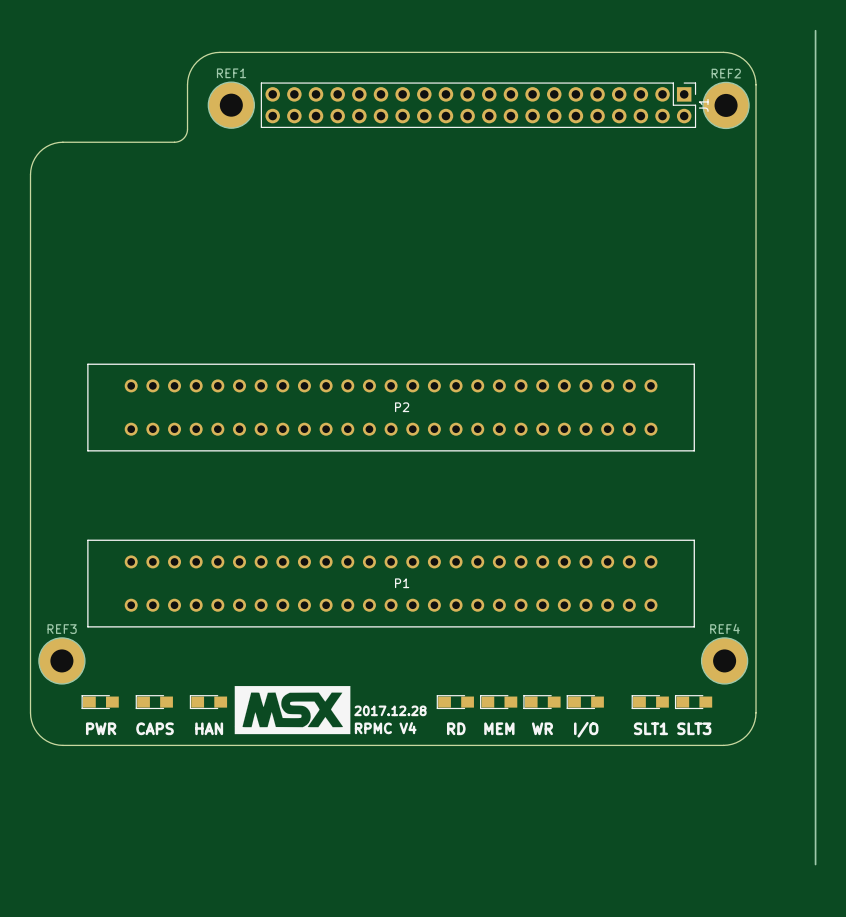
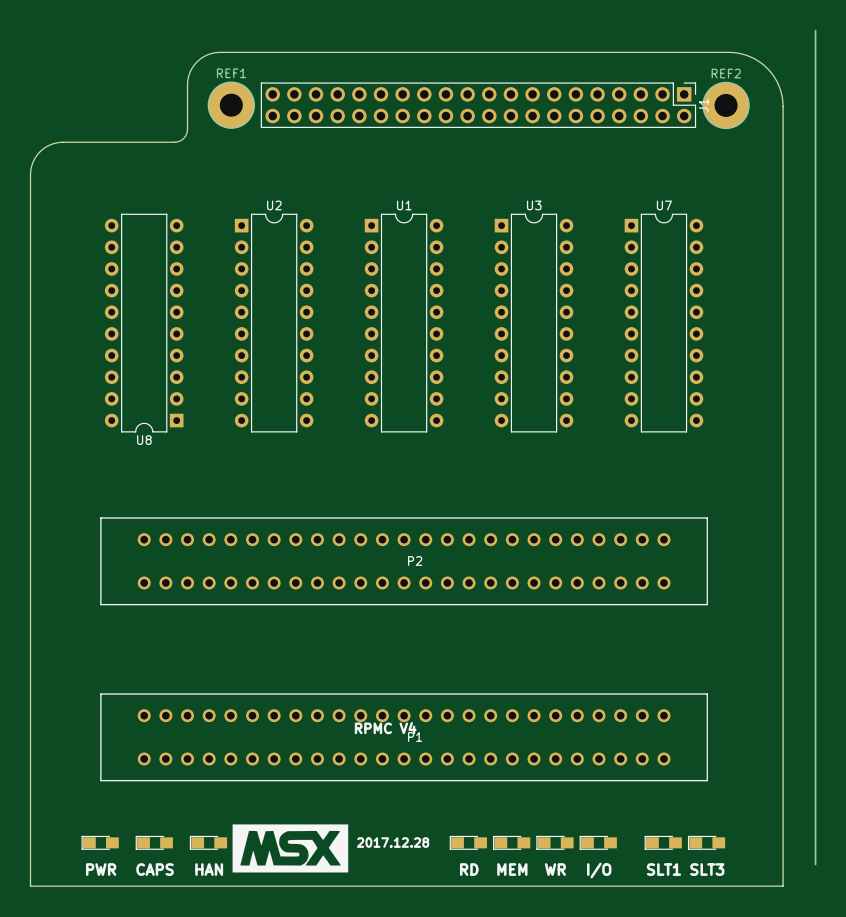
board edge: (723, 52) (735, 54) (746, 61) (753, 72) (756, 84) (756, 712) -> none
U8: none -> (144, 323)
U2: none -> (274, 323)
U1: none -> (404, 323)
U3: none -> (534, 323)
U7: none -> (663, 323)
P2 position: (391, 407) -> (404, 561)
P1 position: (391, 583) -> (404, 737)
REF3: (61, 660) -> none
REF4: (724, 660) -> none
part: (100, 702) -> none
part: (154, 702) -> none
part: (208, 702) -> none
part: (455, 702) -> none
part: (498, 702) -> none
part: (542, 702) -> none
part: (585, 702) -> none
part: (650, 702) -> none
part: (693, 702) -> none
drawing position: (292, 710) -> (290, 848)
text position: 2017.12.28 (390, 710) -> 2017.12.28 (393, 842)
board edge: (30, 712) (32, 725) (40, 735) (50, 742) (62, 745) (723, 745) -> (30, 712) (30, 886) (783, 886) (782, 101) (776, 80) (763, 64) (744, 54) (723, 52)
board edge: (755, 712) (753, 725) (746, 735) (735, 742) (723, 745) -> none
text position: PWR (101, 728) -> PWR (101, 869)
text position: CAPS (155, 728) -> CAPS (155, 869)
text position: HAN (209, 728) -> HAN (209, 869)
text position: RD (456, 728) -> RD (469, 869)
text position: MEM (499, 728) -> MEM (512, 869)
text position: WR (542, 728) -> WR (555, 869)
text position: SLT1 (650, 728) -> SLT1 (663, 869)
text position: SLT3 (694, 728) -> SLT3 (707, 869)
text position: I/O (586, 729) -> I/O (599, 870)
part: none -> (100, 842)
part: none -> (154, 842)
part: none -> (208, 842)
part: none -> (468, 842)
part: none -> (511, 842)
part: none -> (555, 842)
part: none -> (598, 842)
part: none -> (663, 842)
part: none -> (706, 842)

